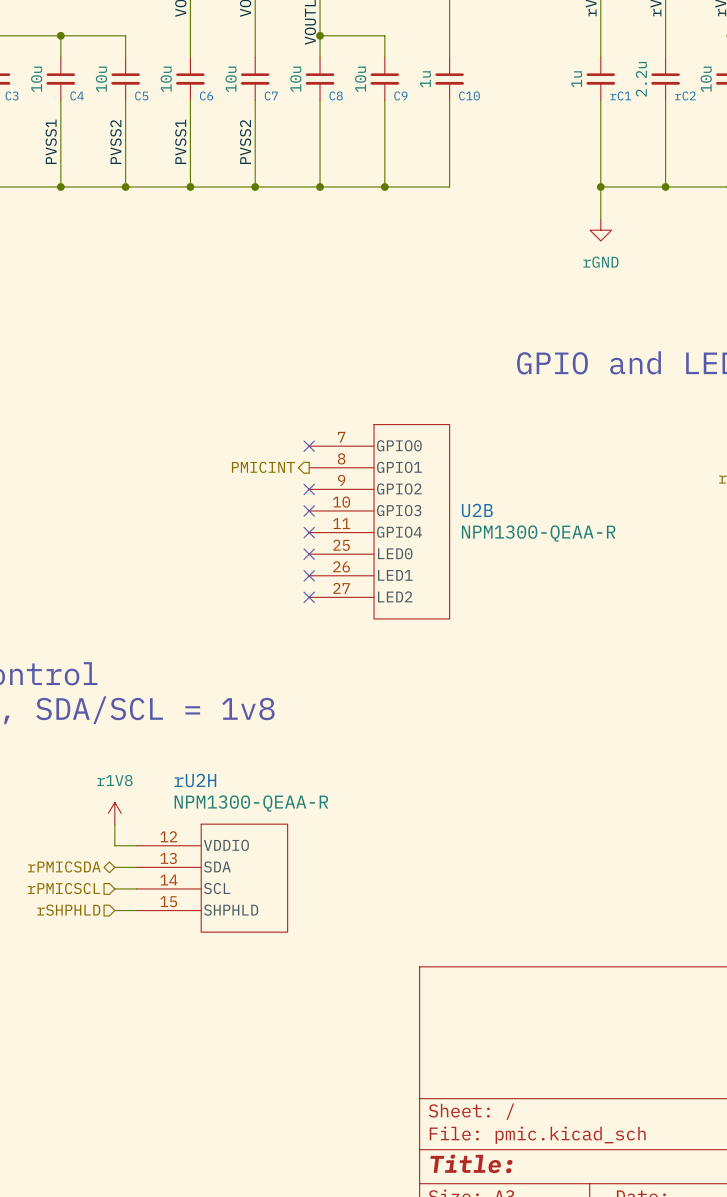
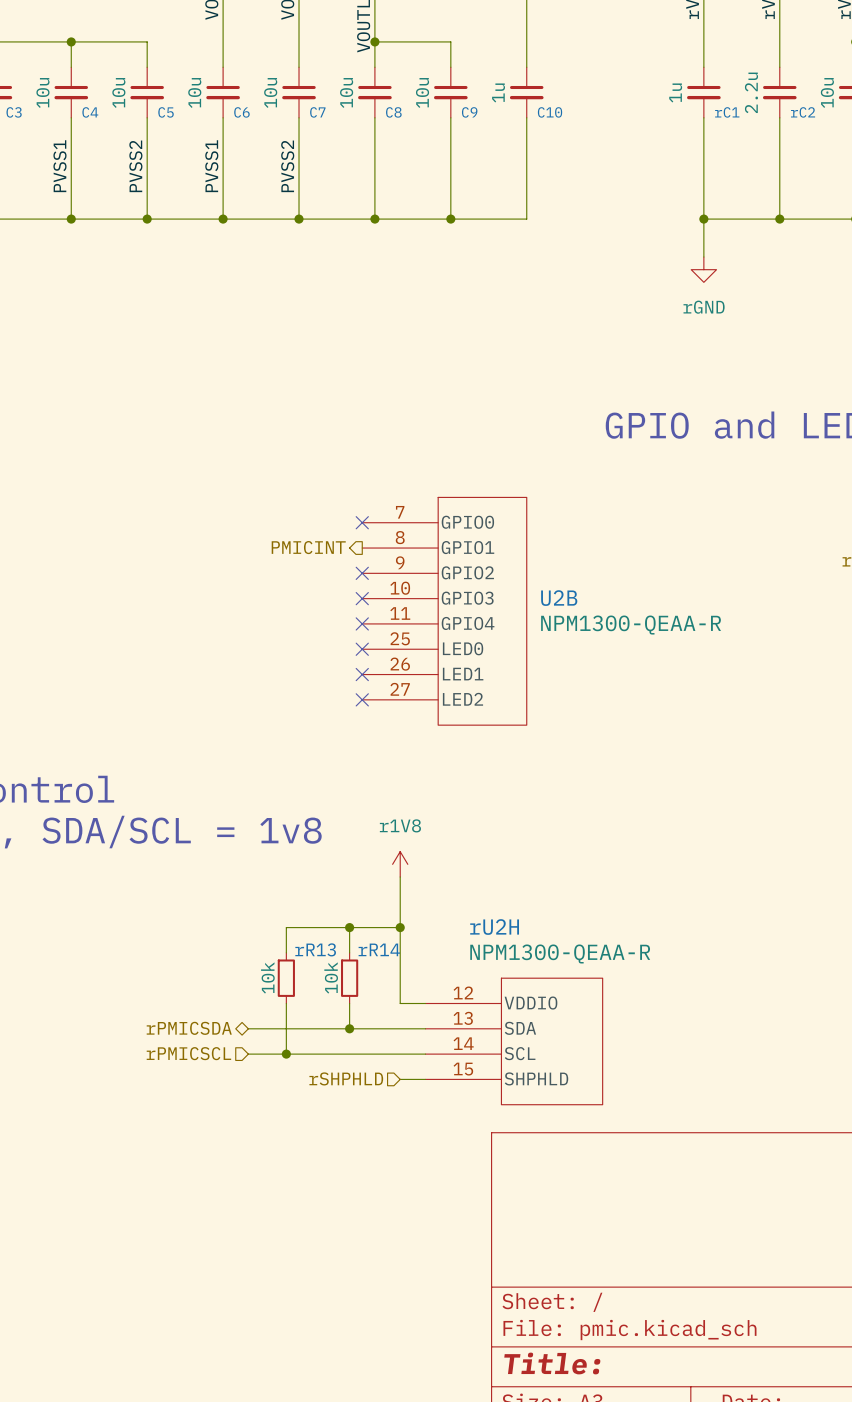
power symbol: none -> r1V8 (400, 864)
wire: none -> (400, 876) (400, 1003) (425, 1003)
wire: none -> (349, 927) (349, 952)
junction: none -> (349, 927)
wire: none -> (400, 927) (286, 927) (286, 952)
junction: none -> (400, 927)
power symbol: r1V8 (114, 813) -> none
wire: (114, 824) (114, 845) (136, 845) -> none
rR13: none -> 10k (286, 978)
rR14: none -> 10k (349, 978)
wire: none -> (286, 1003) (286, 1054)
wire: none -> (349, 1003) (349, 1028)
hierarchical label position: rPMICSDA (64, 866) -> rPMICSDA (189, 1028)
wire: (114, 867) (136, 867) -> none
wire: none -> (248, 1028) (425, 1028)
rU2H position: (212, 878) -> (514, 1041)
junction: none -> (349, 1028)
hierarchical label position: rPMICSCL (64, 888) -> rPMICSCL (188, 1053)
wire: (114, 888) (136, 888) -> none
wire: none -> (248, 1054) (425, 1054)
junction: none -> (286, 1054)
hierarchical label: rSHPHLD (68, 910) -> none
wire: (114, 910) (136, 910) -> none
hierarchical label: none -> rSHPHLD (346, 1078)
wire: none -> (400, 1079) (425, 1079)

